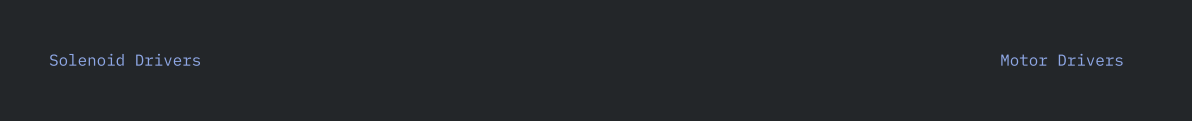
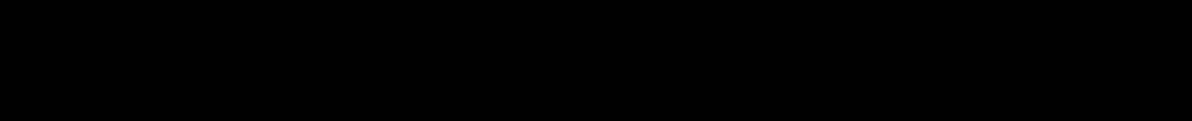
text: Solenoid Drivers (124, 59) -> none
text: Motor Drivers (1061, 59) -> none

